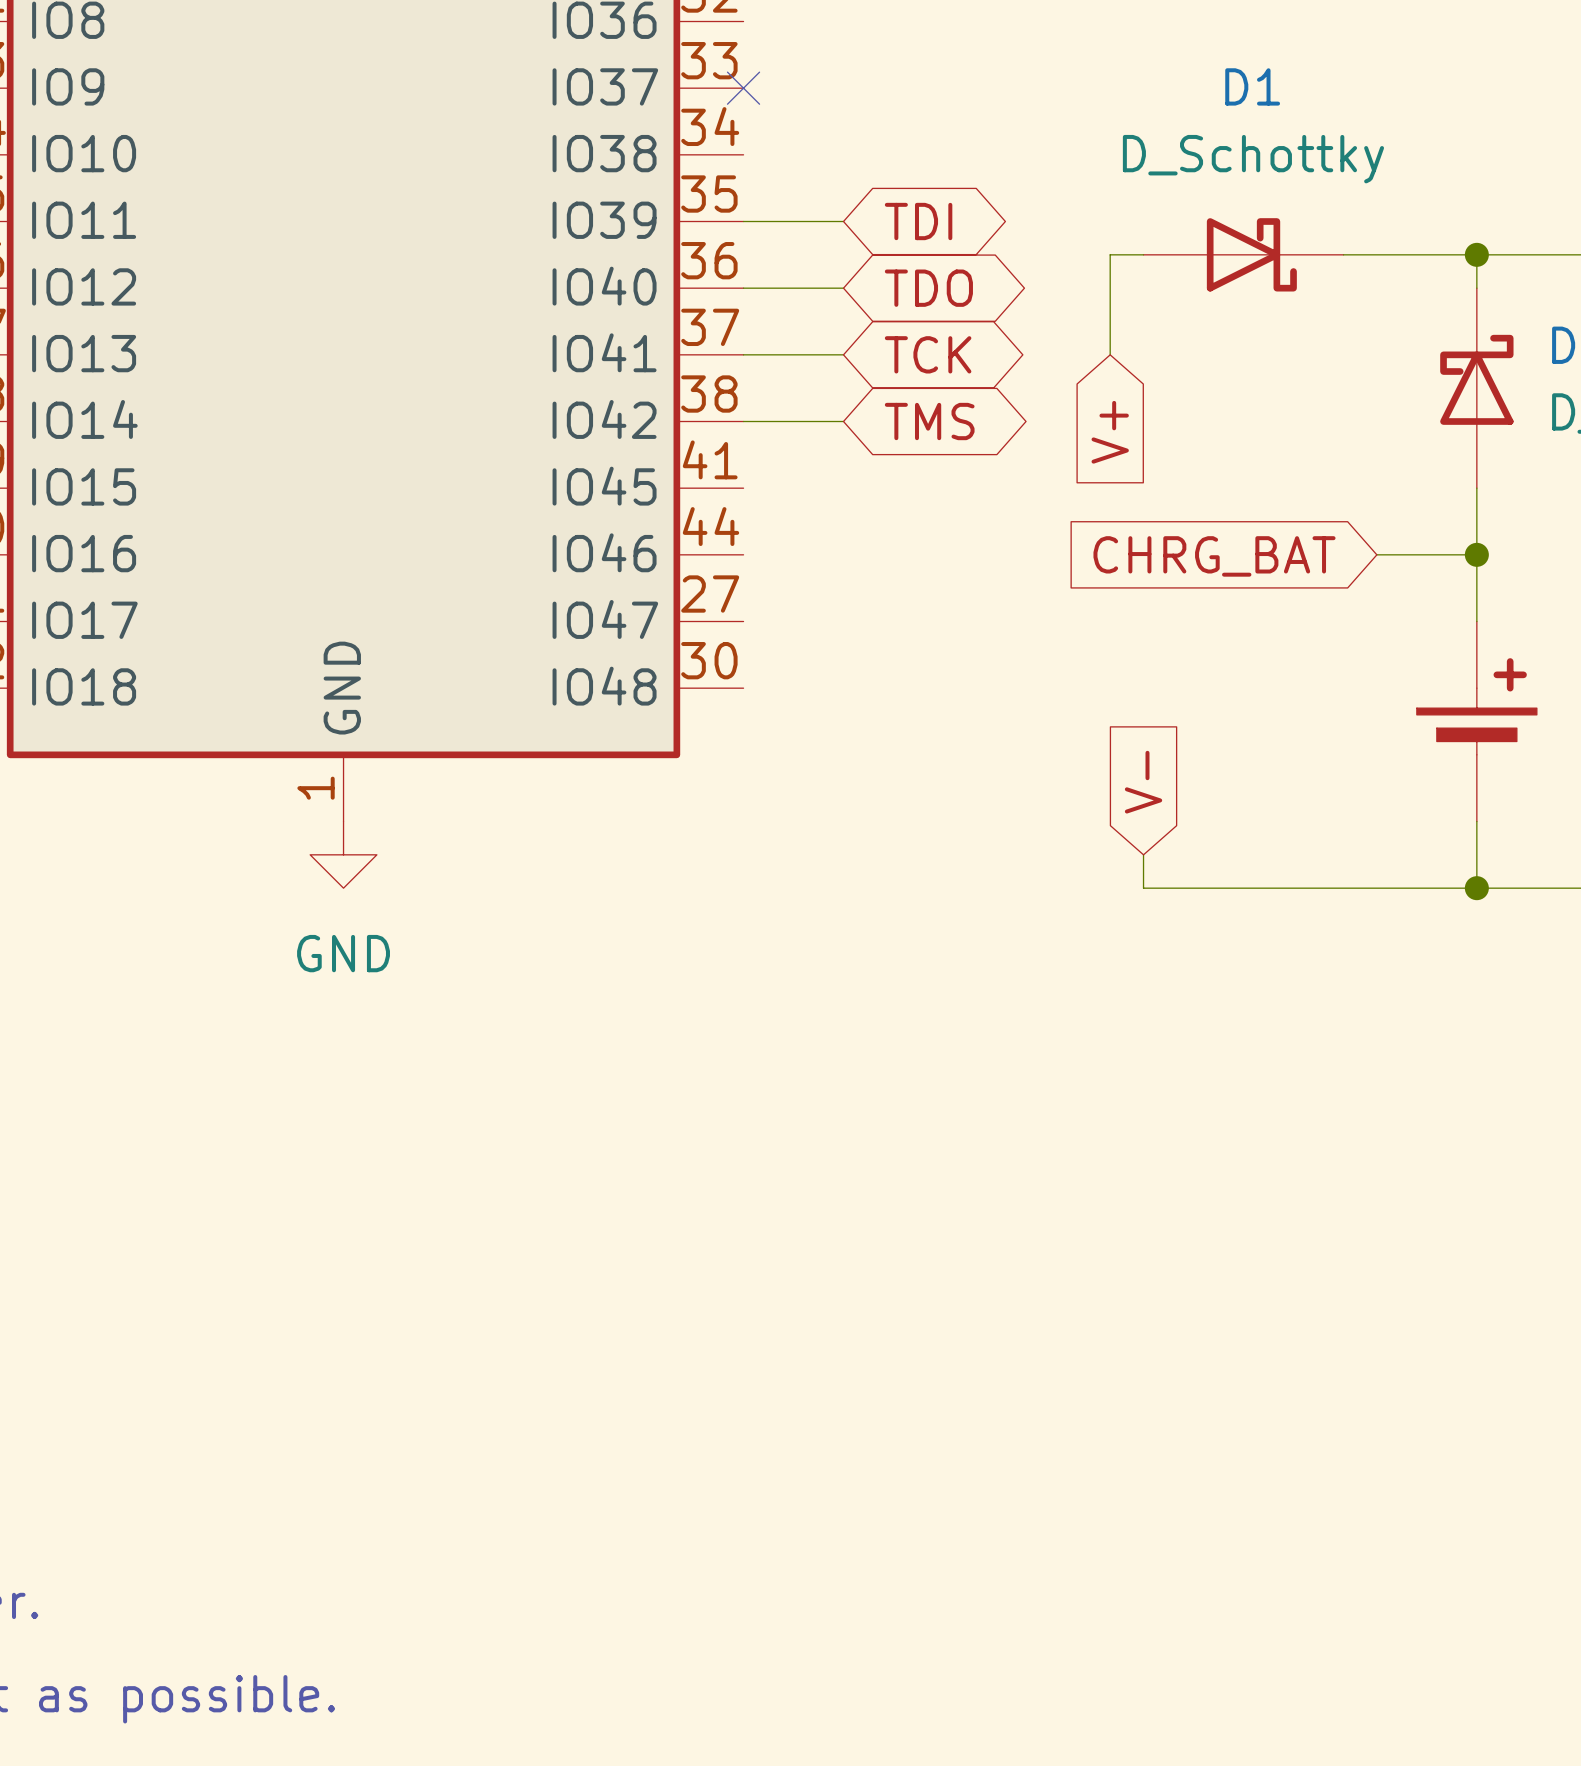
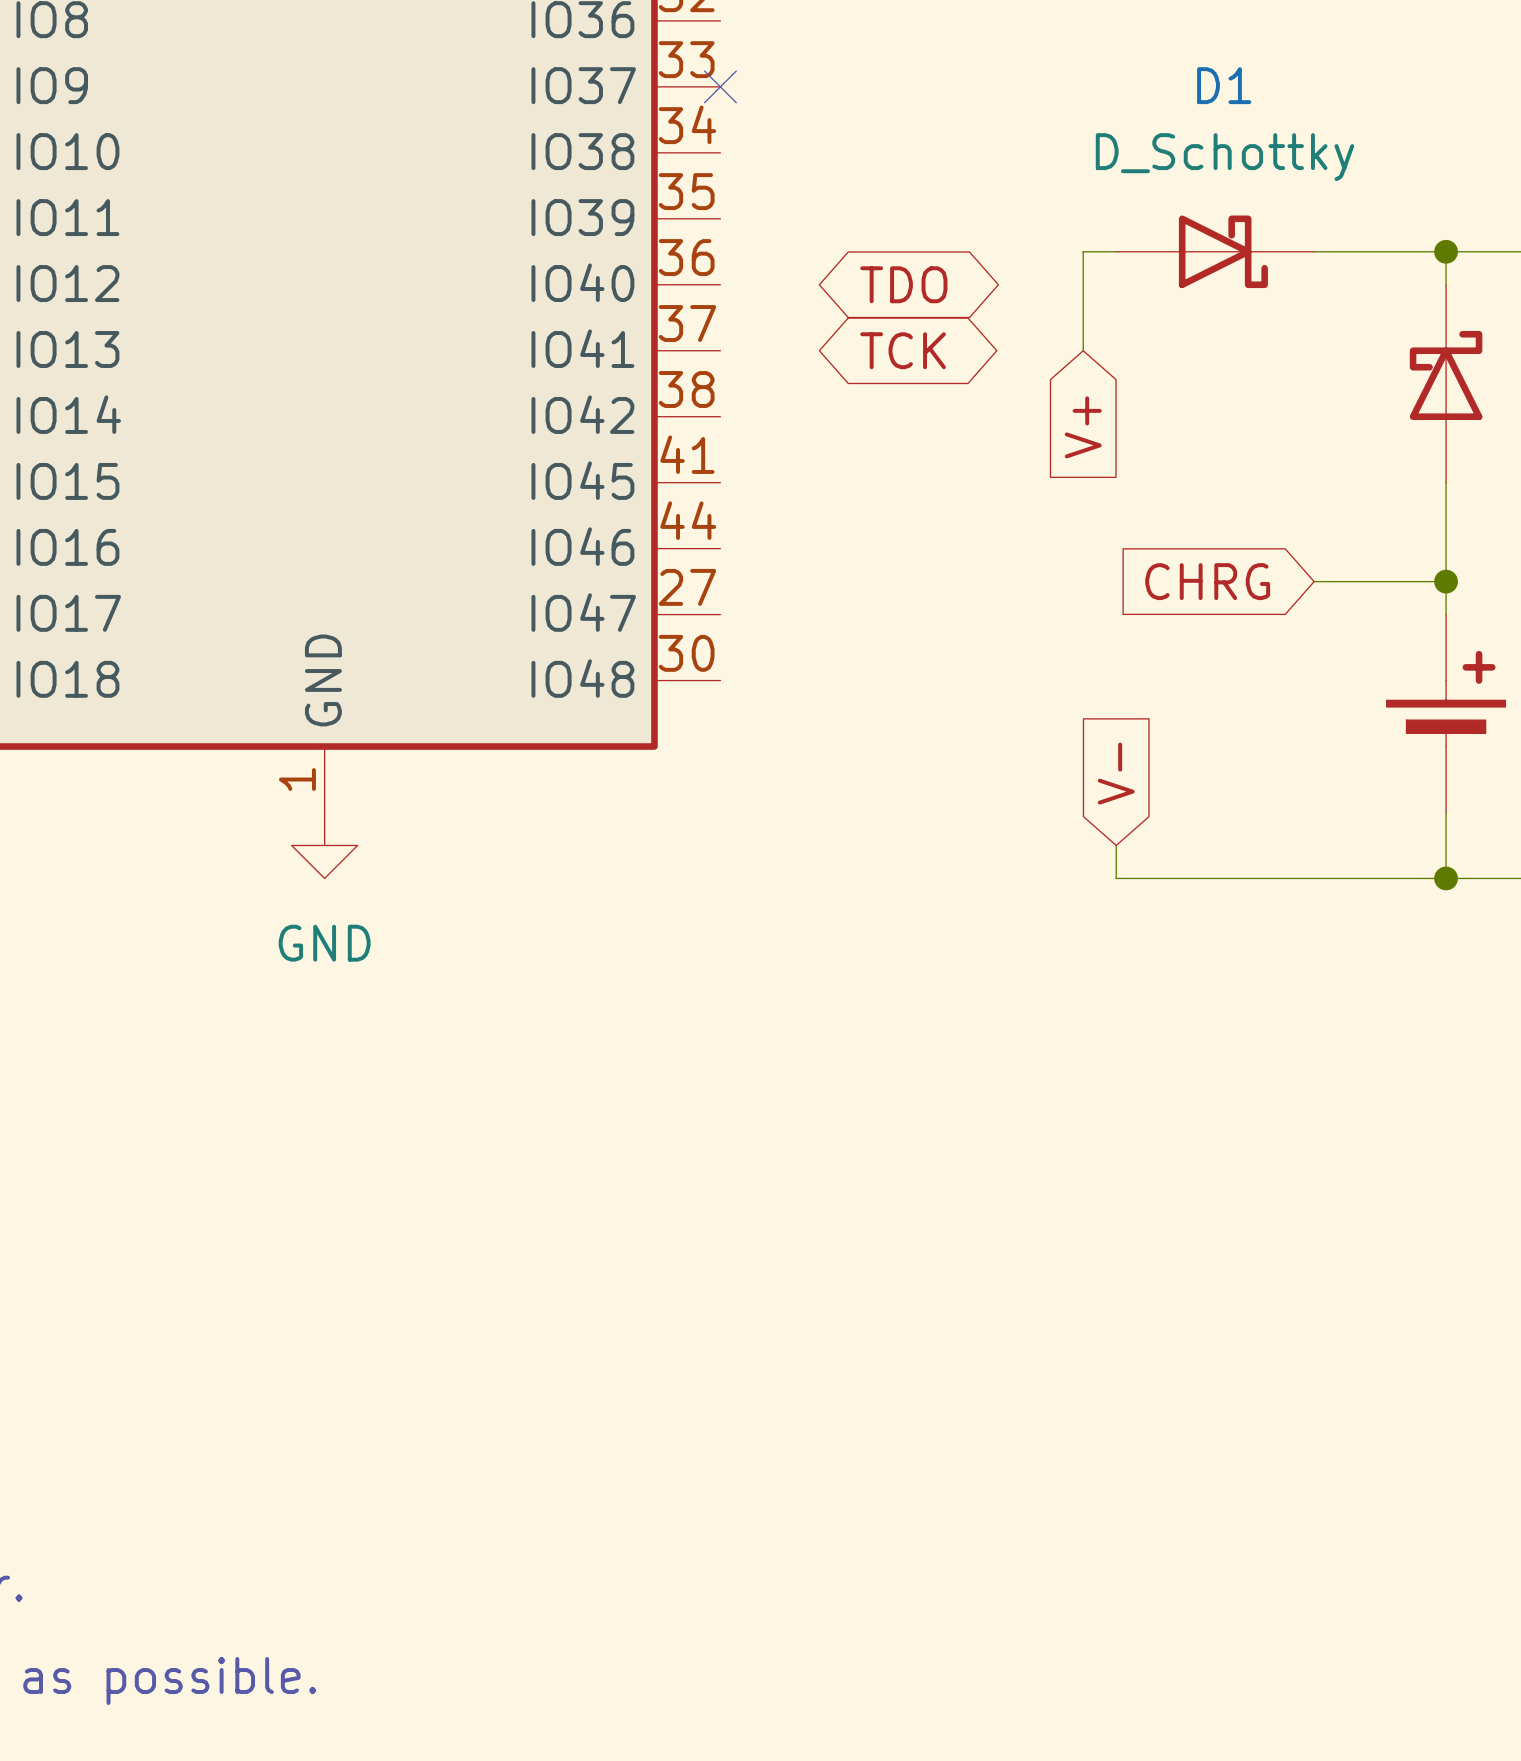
wire: (743, 221) (843, 221) -> none
global label: TDI (918, 221) -> none
wire: (743, 288) (843, 288) -> none
wire: (743, 354) (843, 354) -> none
wire: (743, 421) (843, 421) -> none
global label: TMS (929, 421) -> none
wire: (1376, 554) (1476, 554) -> none
junction position: (1476, 554) -> (1446, 581)
global label: CHRG_BAT (1214, 556) -> CHRG (1207, 581)
wire: none -> (1314, 581) (1446, 581)

